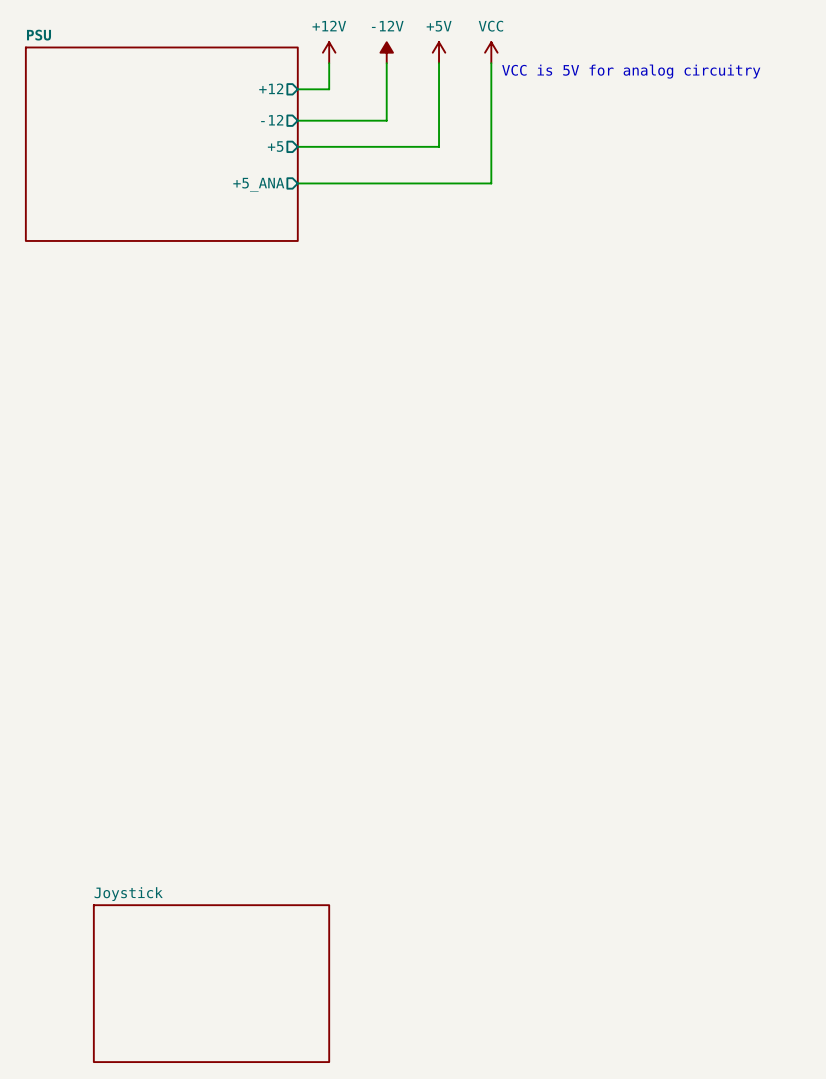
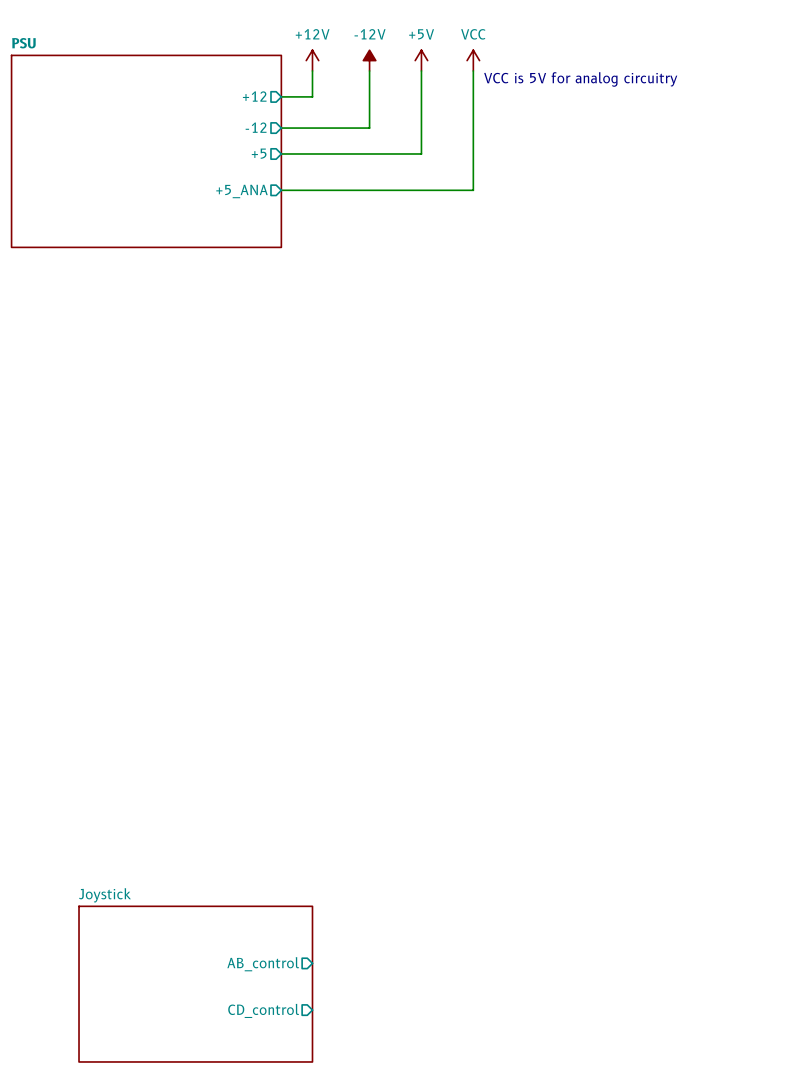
sheet pin: none -> AB_control (263, 964)
sheet pin: none -> CD_control (263, 1010)

